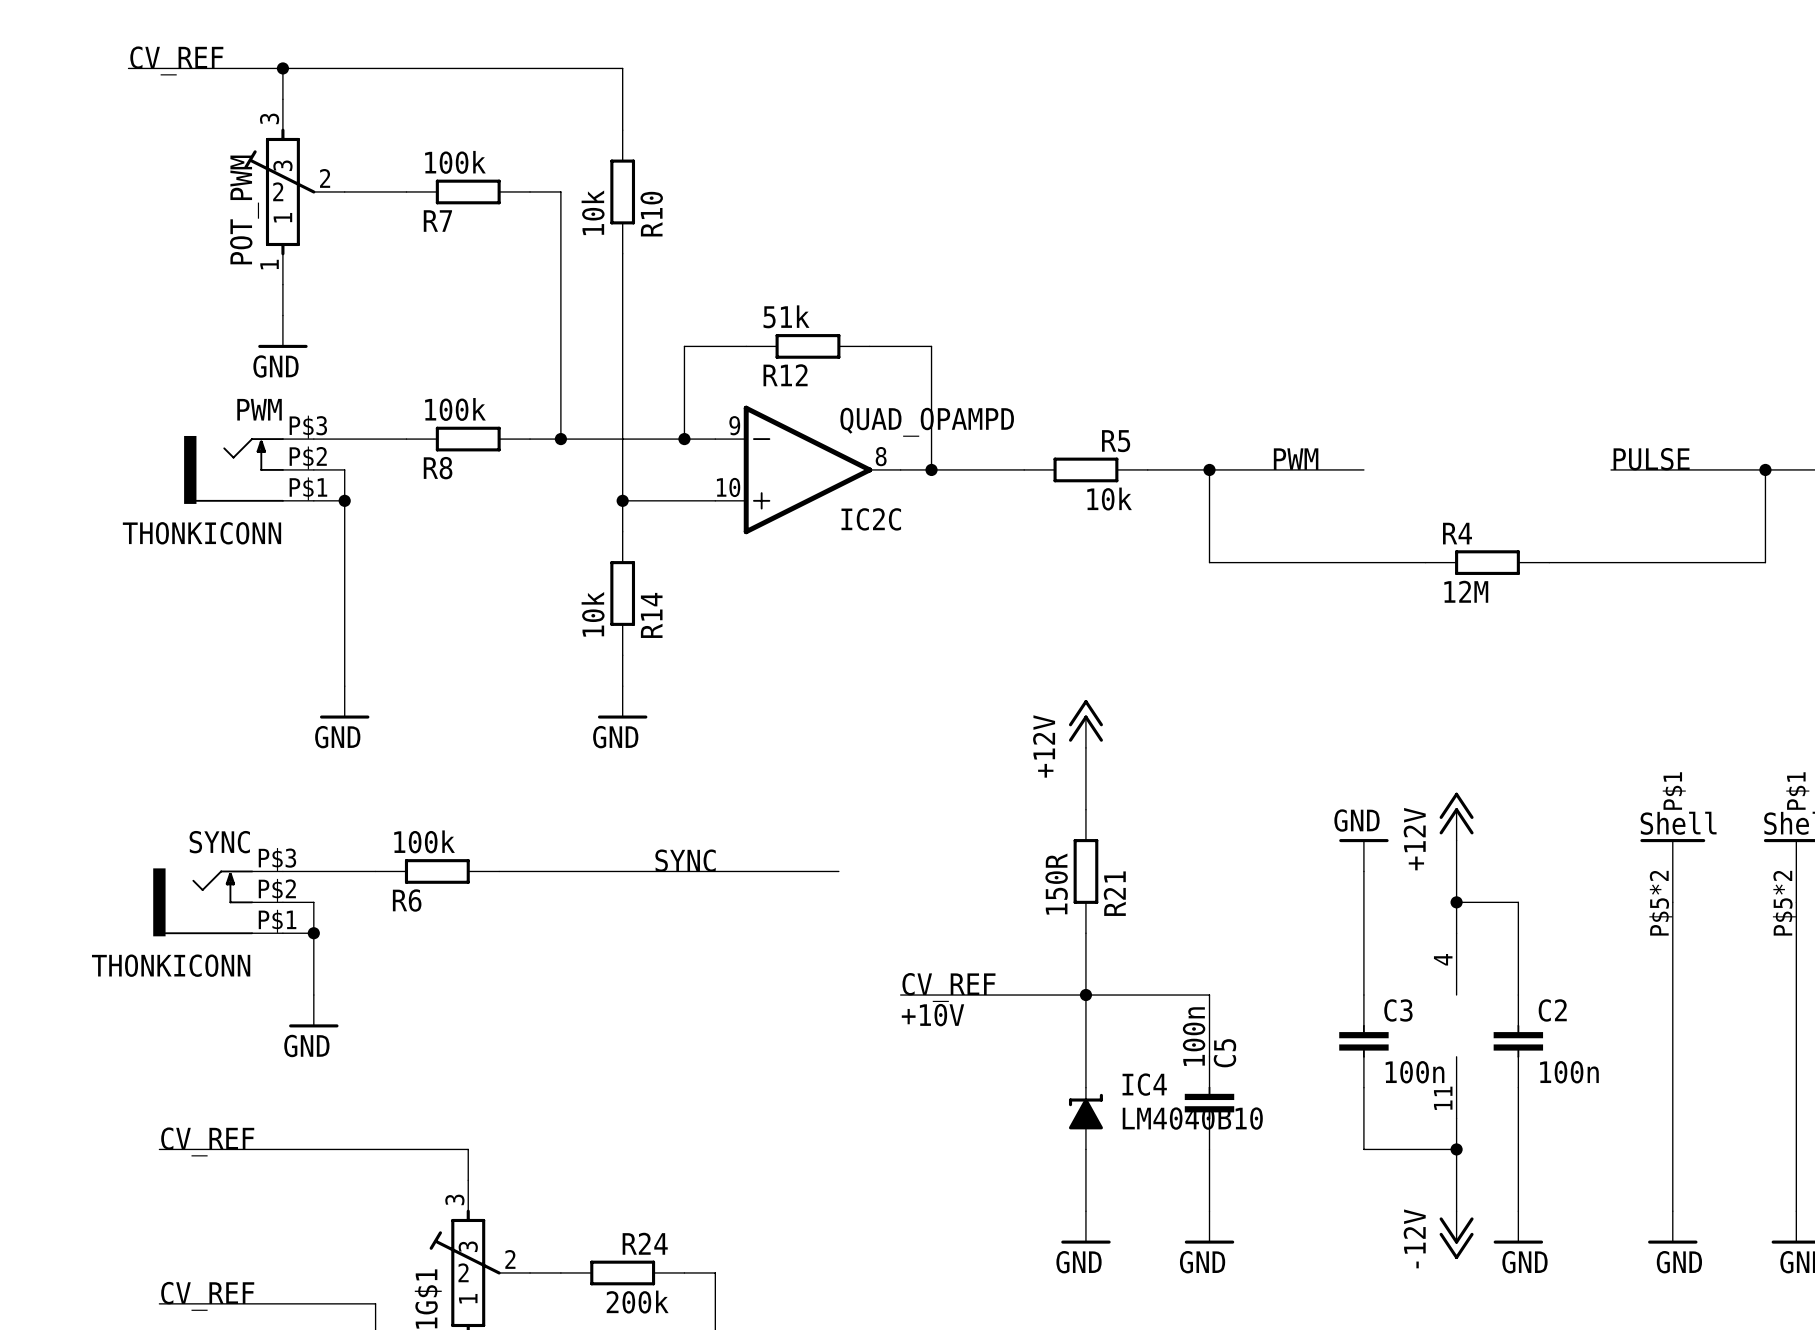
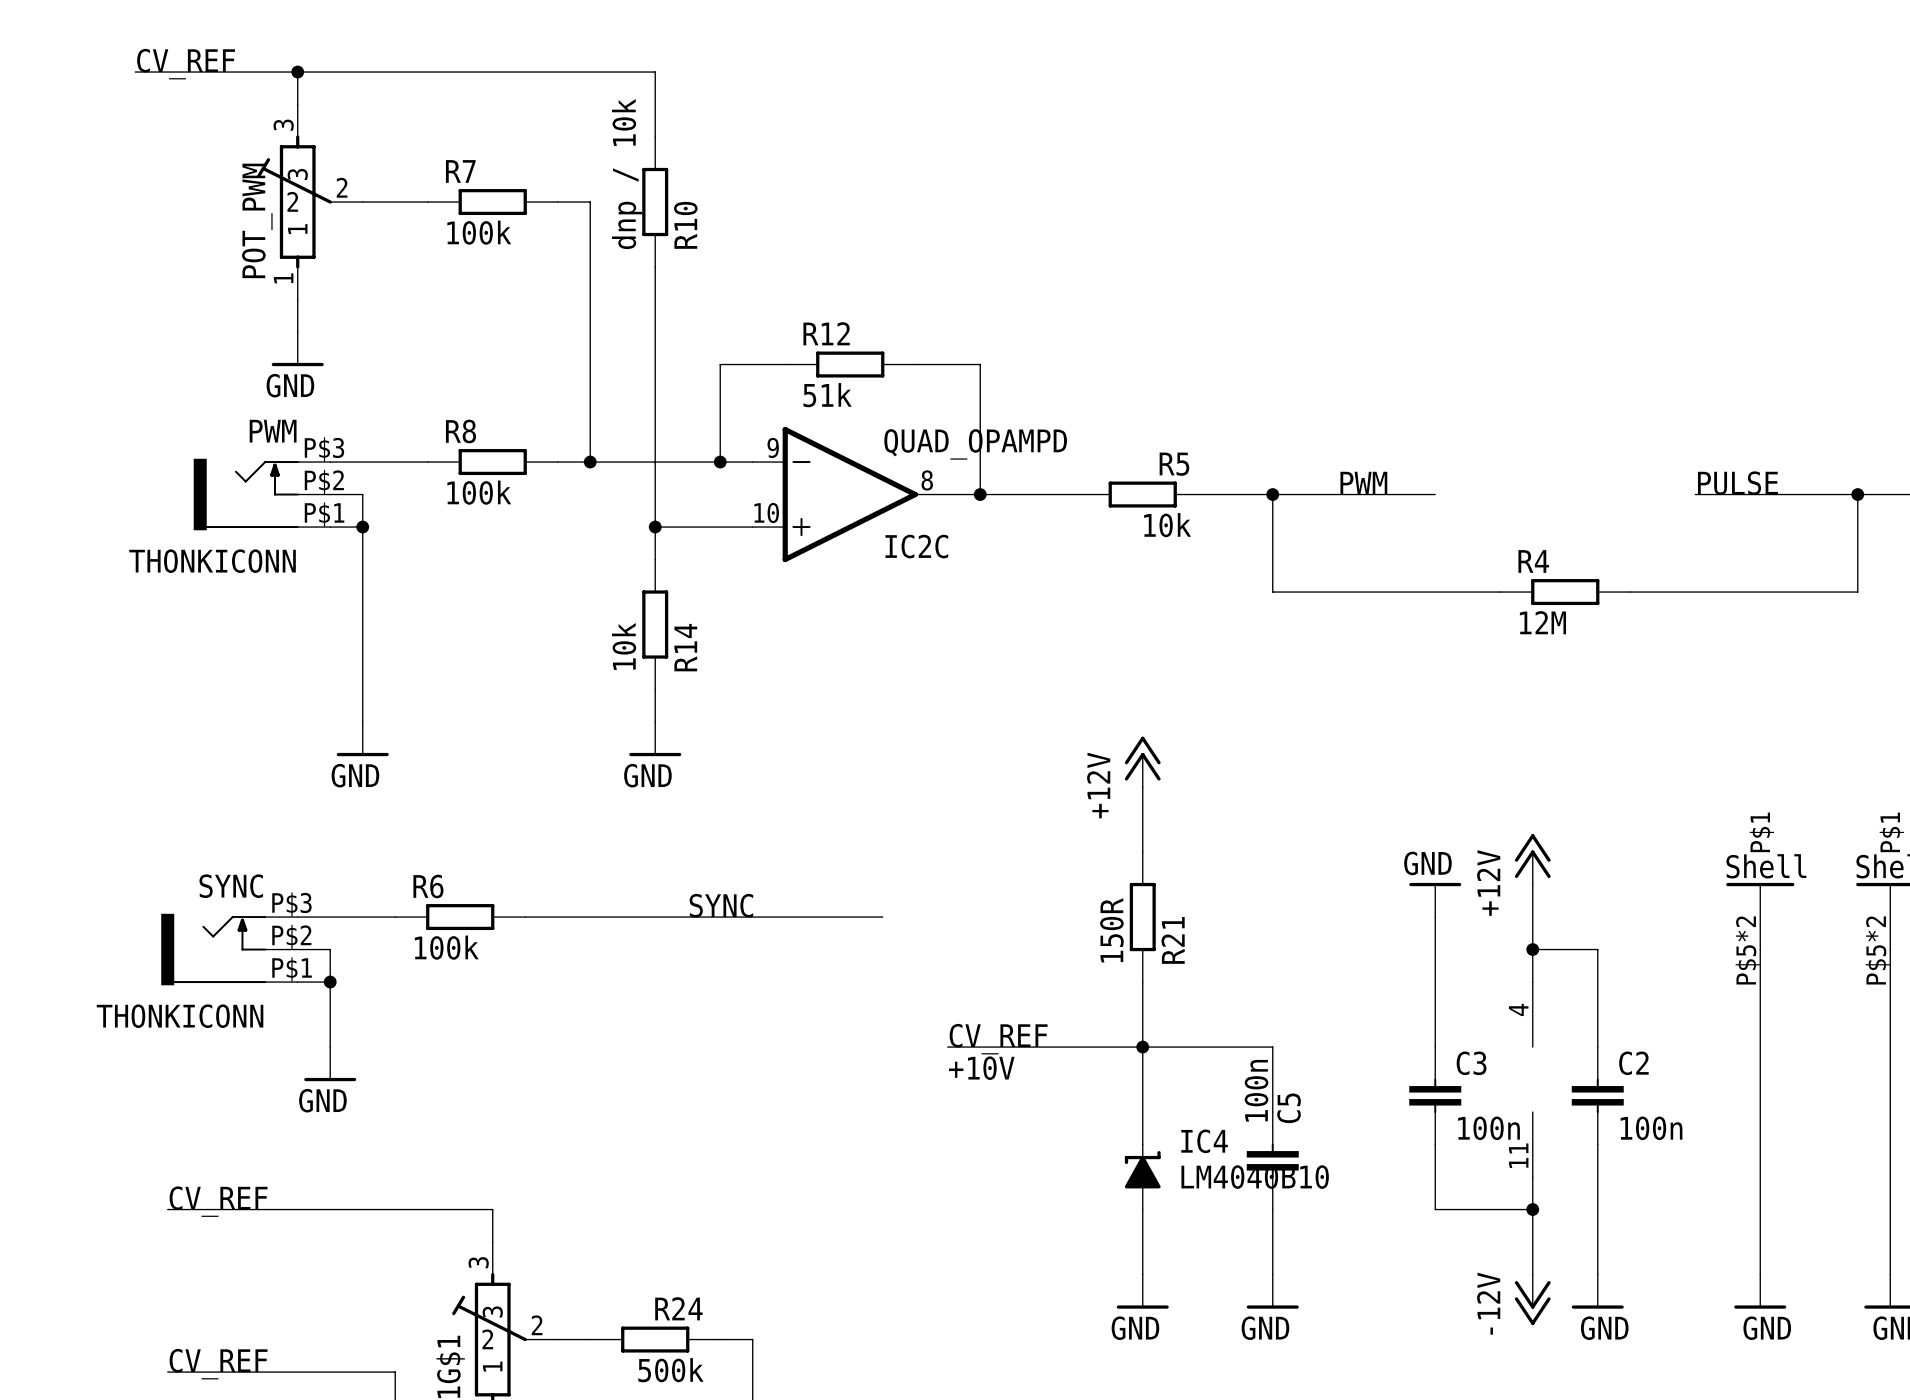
R7 value position: 100k (455, 162) -> 100k (479, 232)
R10 value: 10k (593, 212) -> dnp / 10k (627, 174)
R7 name position: R7 (437, 221) -> R7 (460, 171)
R12 value position: 51k (786, 316) -> 51k (827, 395)
R12 name position: R12 (785, 375) -> R12 (826, 333)
R8 value position: 100k (455, 409) -> 100k (479, 492)
R8 name position: R8 (438, 468) -> R8 (460, 431)
R6 value position: 100k (424, 841) -> 100k (446, 947)
R6 name position: R6 (407, 900) -> R6 (428, 886)
R24 value: 200k (637, 1302) -> 500k (670, 1370)

